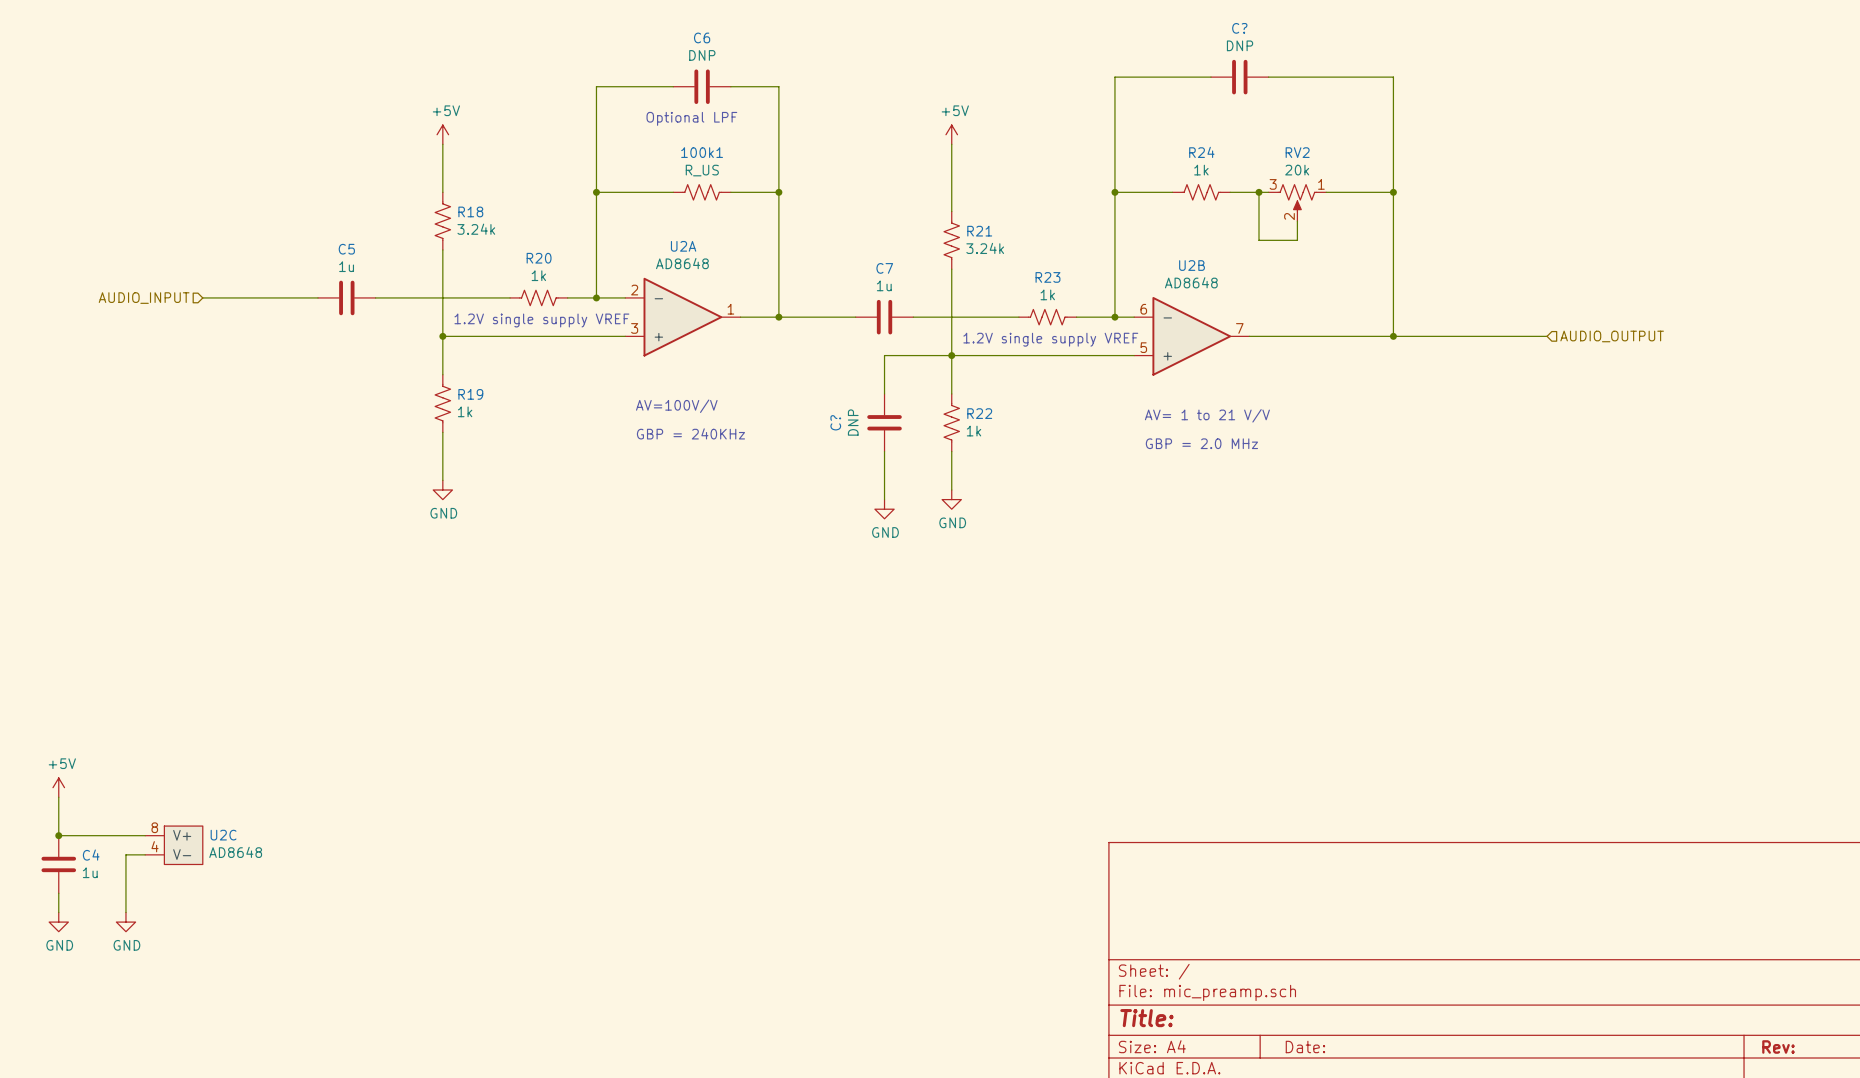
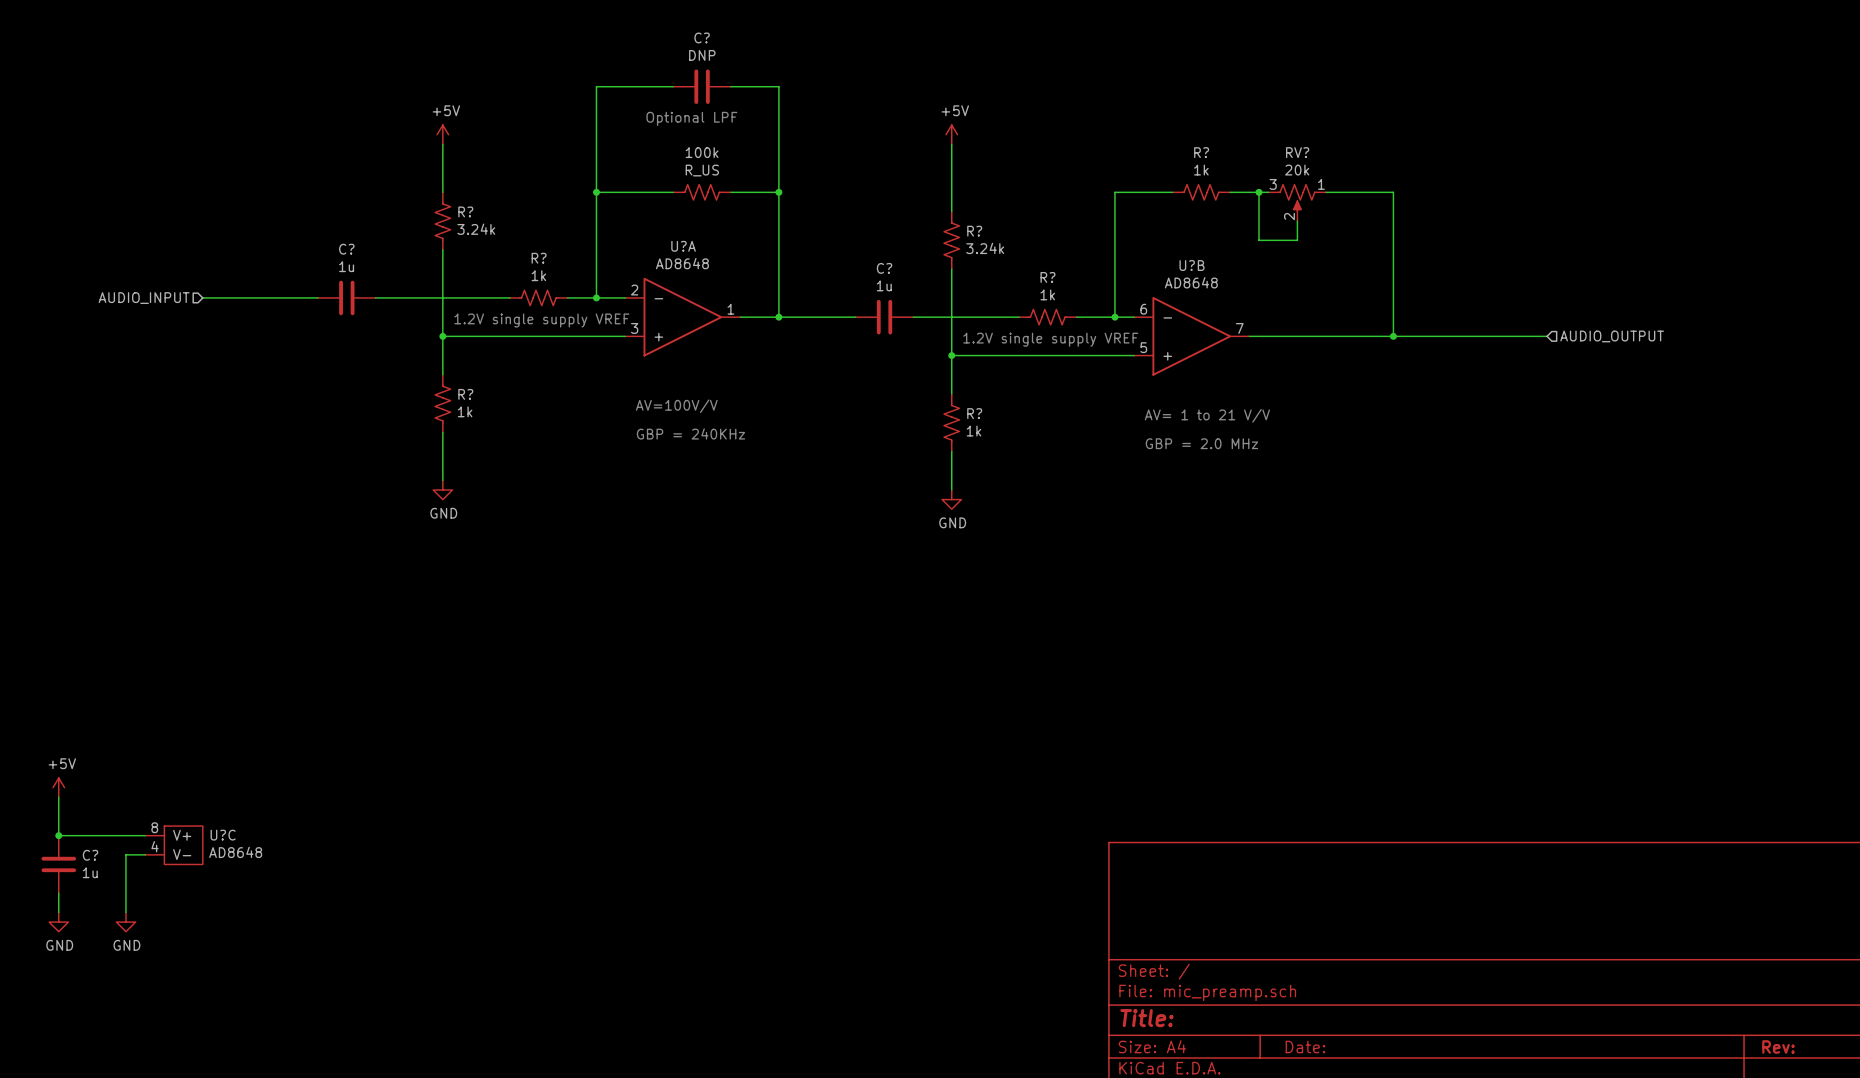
C6 name: C6 (702, 37) -> C? (702, 37)
wire: (1210, 77) (1114, 77) (1114, 192) -> none
C?: DNP (1239, 77) -> none
wire: (1268, 77) (1393, 77) (1393, 192) -> none
100k1 name: 100k1 (702, 152) -> 100k (702, 152)
R24 name: R24 (1201, 152) -> R? (1201, 152)
RV2 name: RV2 (1297, 152) -> RV? (1297, 152)
junction: (1114, 192) -> none
junction: (1393, 192) -> none
R18 name: R18 (470, 211) -> R? (465, 211)
R21 name: R21 (979, 231) -> R? (974, 231)
U2A name: U2A (683, 246) -> U?A (683, 246)
C5 name: C5 (346, 249) -> C? (346, 249)
R20 name: R20 (539, 258) -> R? (539, 258)
U2B name: U2B (1192, 265) -> U?B (1192, 265)
C7 name: C7 (884, 268) -> C? (884, 268)
R23 name: R23 (1047, 277) -> R? (1047, 277)
wire: (951, 355) (884, 355) (884, 393) -> none
R19 name: R19 (470, 394) -> R? (465, 394)
R22 name: R22 (979, 413) -> R? (974, 413)
C?: DNP (884, 422) -> none
wire: (884, 451) (884, 499) -> none
power symbol: GND (884, 509) -> none
U2C name: U2C (223, 835) -> U?C (223, 835)
C4 name: C4 (91, 855) -> C? (90, 855)

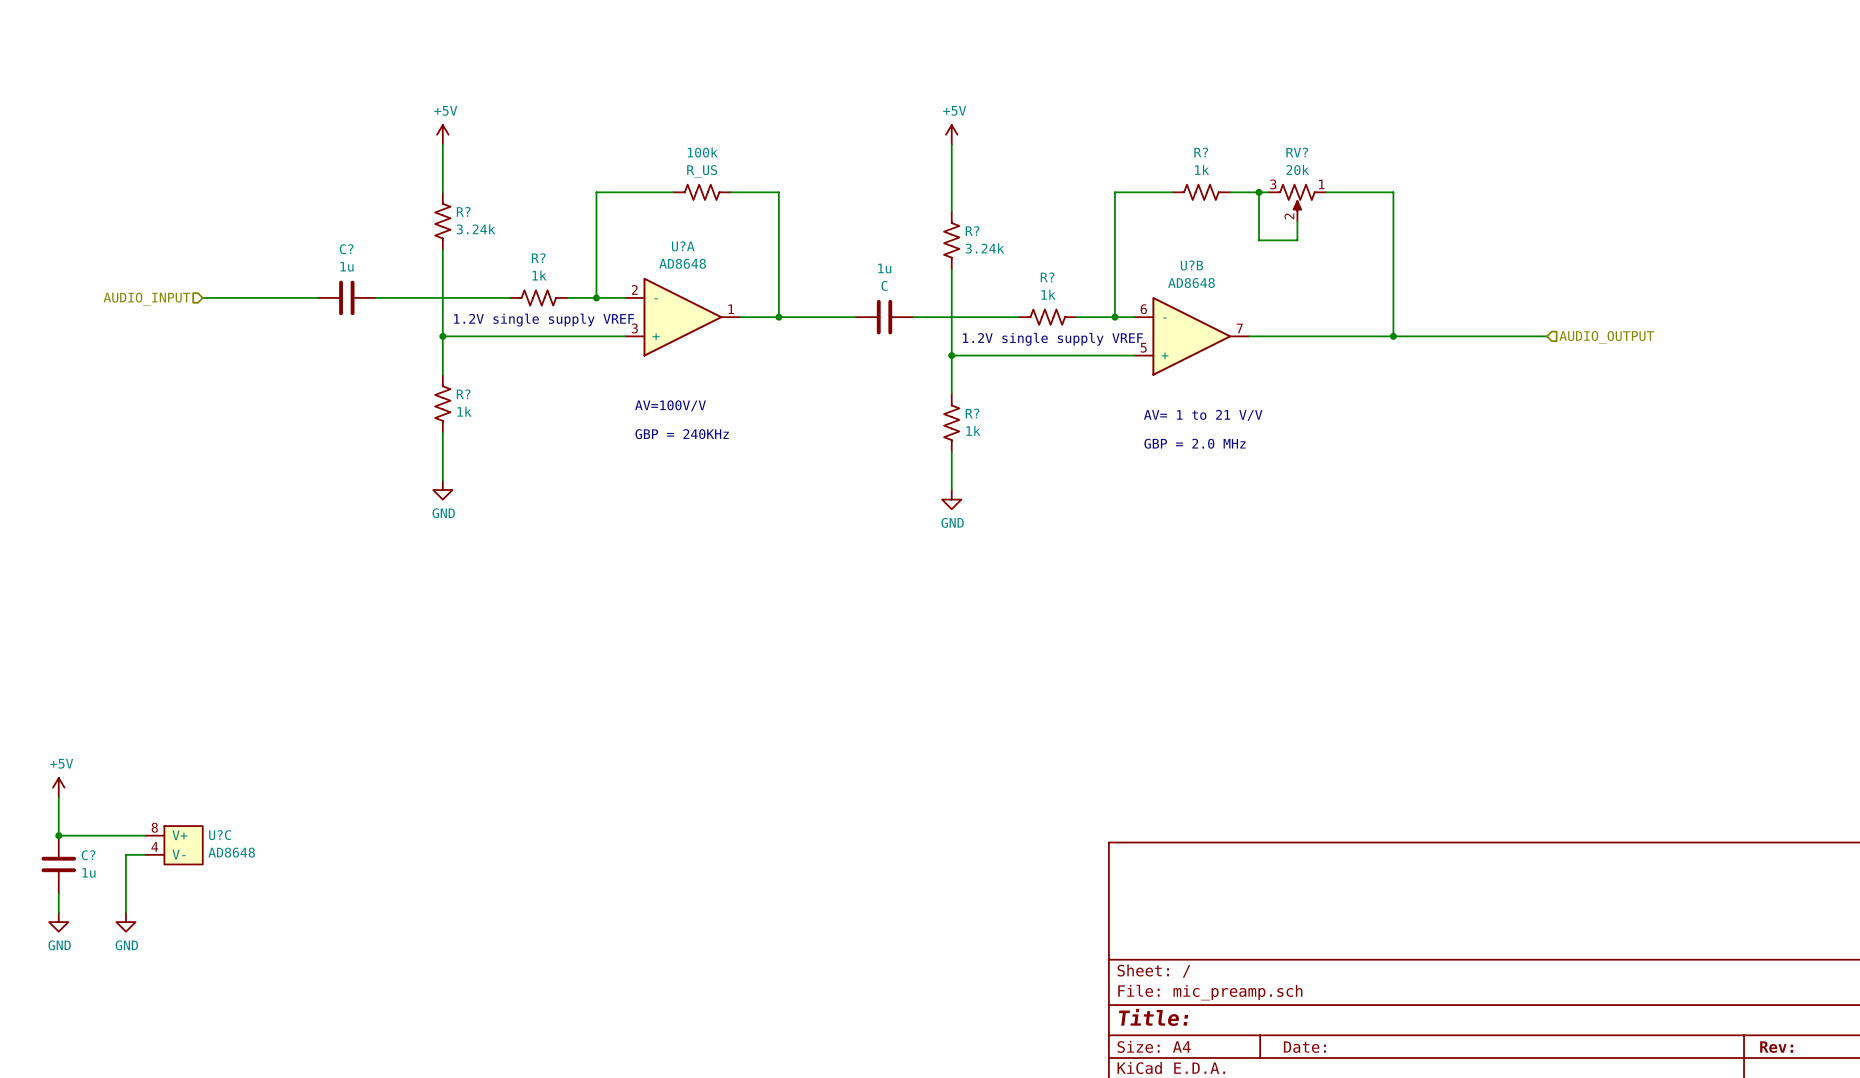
wire: (673, 86) (596, 86) (596, 192) -> none
C?: DNP (702, 86) -> none
wire: (730, 86) (778, 86) (778, 192) -> none
text: Optional LPF (691, 118) -> none
junction: (596, 192) -> none
junction: (778, 192) -> none
C? name: C? (884, 268) -> 1u (884, 268)
C? value: 1u (884, 285) -> C (884, 285)

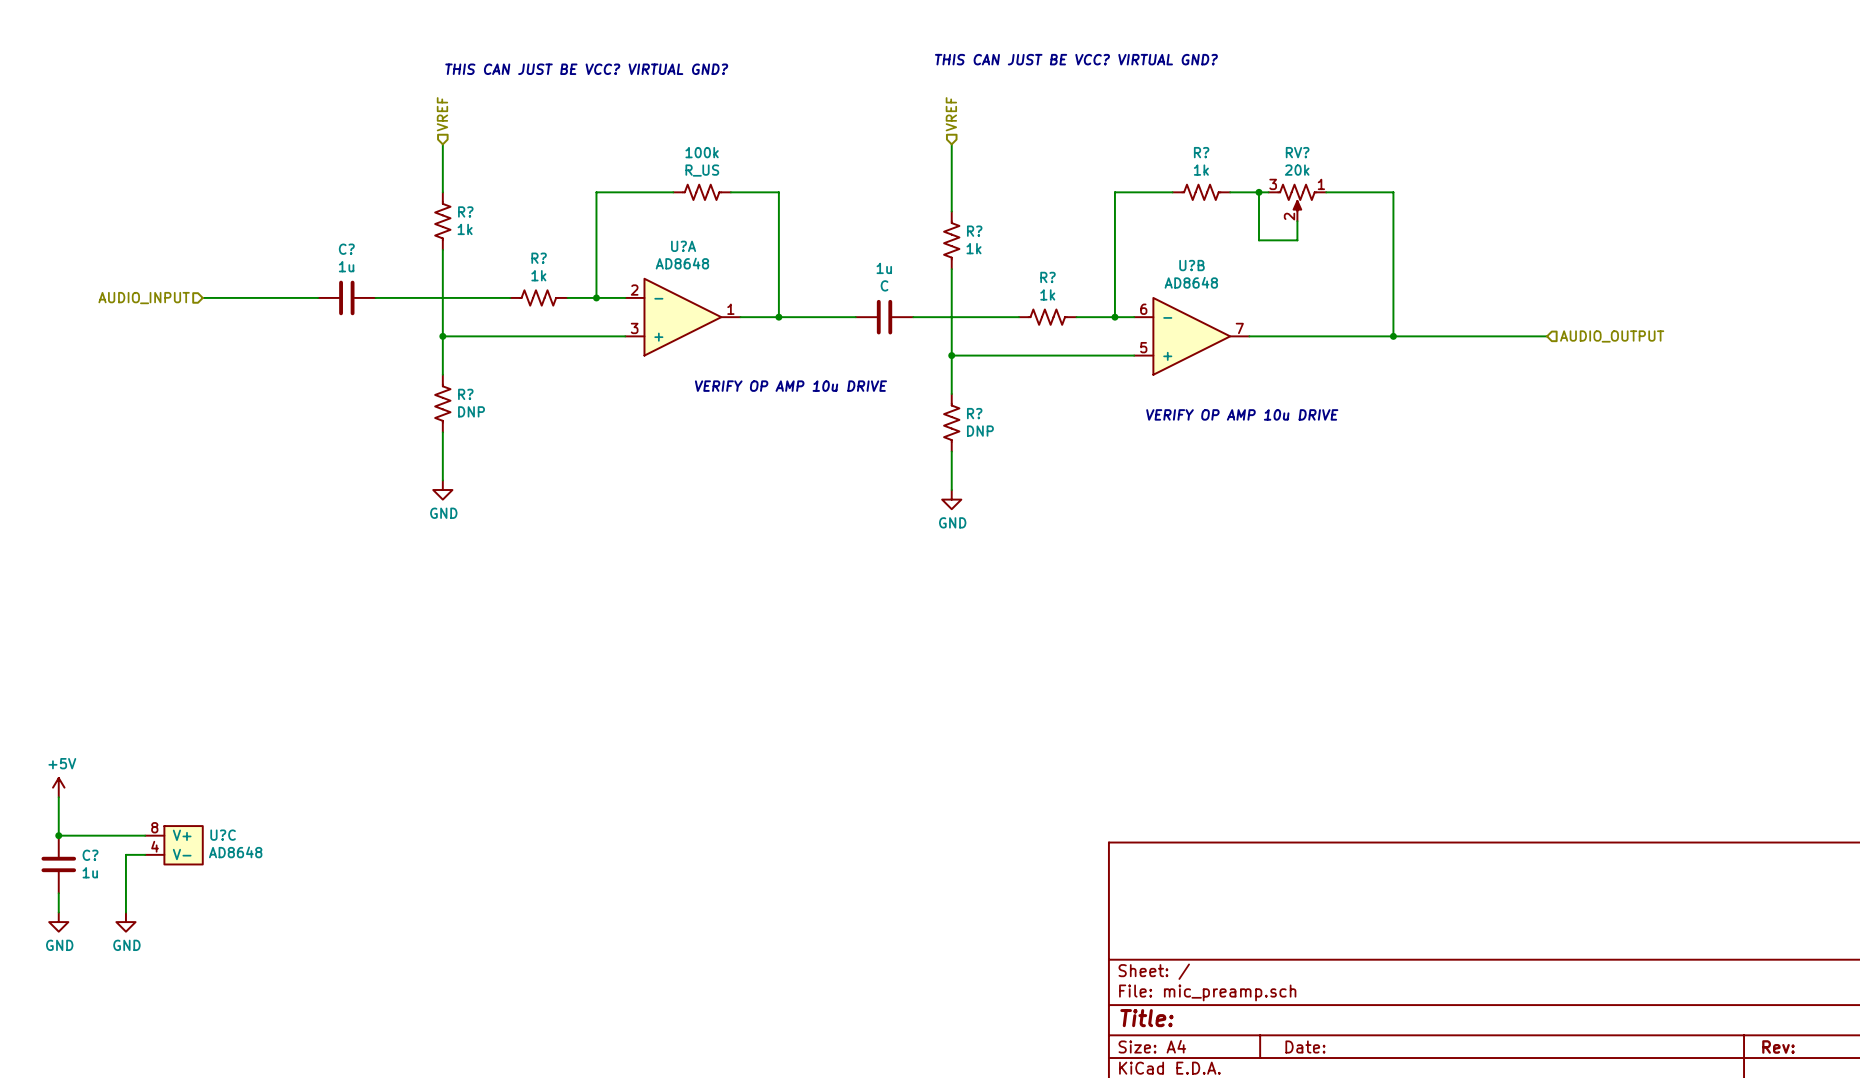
text: none -> THIS CAN JUST BE VCC? VIRTUAL GND? (1076, 59)
text: none -> THIS CAN JUST BE VCC? VIRTUAL GND? (586, 69)
hierarchical label: none -> VREF (442, 114)
hierarchical label: none -> VREF (951, 114)
power symbol: +5V (442, 134) -> none
power symbol: +5V (951, 134) -> none
R? value: 3.24k (476, 229) -> 1k (465, 229)
R? value: 3.24k (984, 248) -> 1k (974, 248)
text: 1.2V single supply VREF (544, 320) -> none
text: 1.2V single supply VREF (1052, 339) -> none
text: none -> VERIFY OP AMP 10u DRIVE (790, 386)
text: AV=100V/V (670, 405) -> none
R? value: 1k (464, 411) -> DNP (471, 411)
text: AV= 1 to 21 V/V (1203, 415) -> VERIFY OP AMP 10u DRIVE (1242, 414)
R? value: 1k (973, 430) -> DNP (980, 431)
text: GBP = 240KHz (682, 434) -> none
text: GBP = 2.0 MHz (1195, 443) -> none

